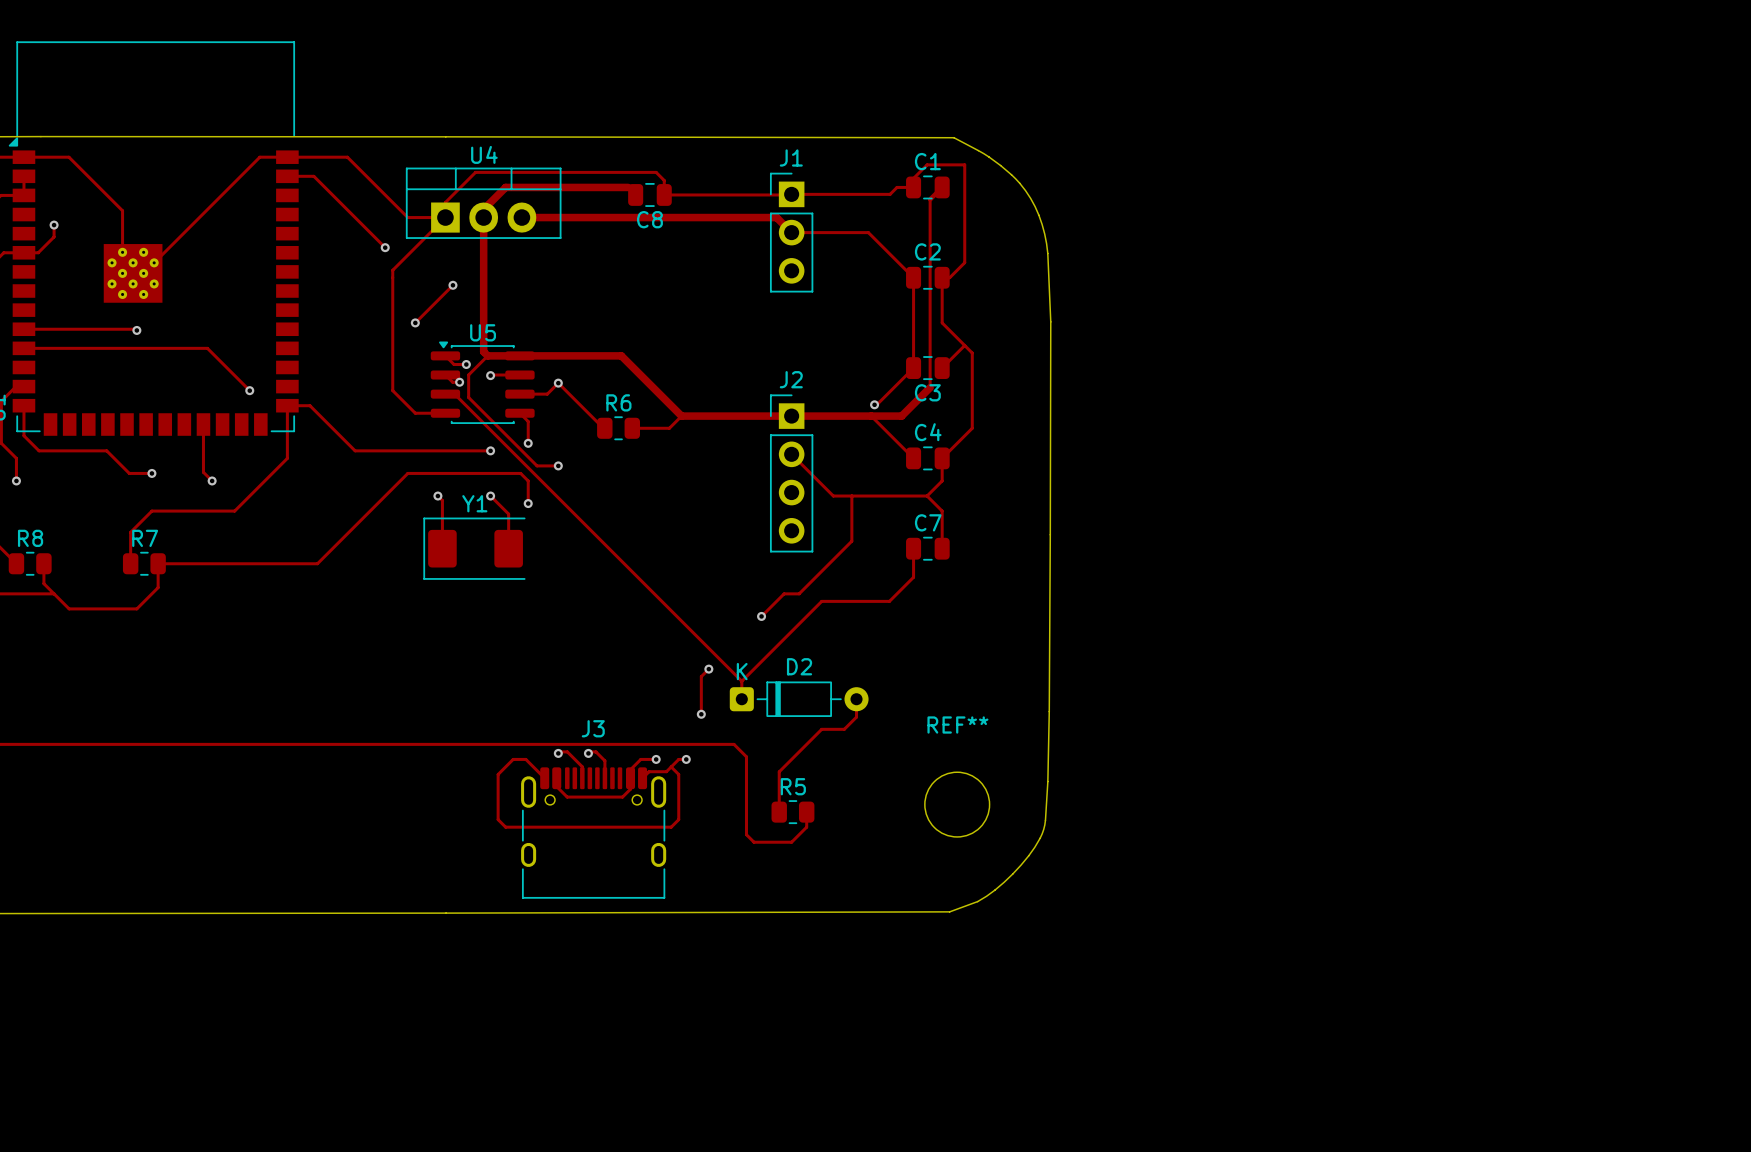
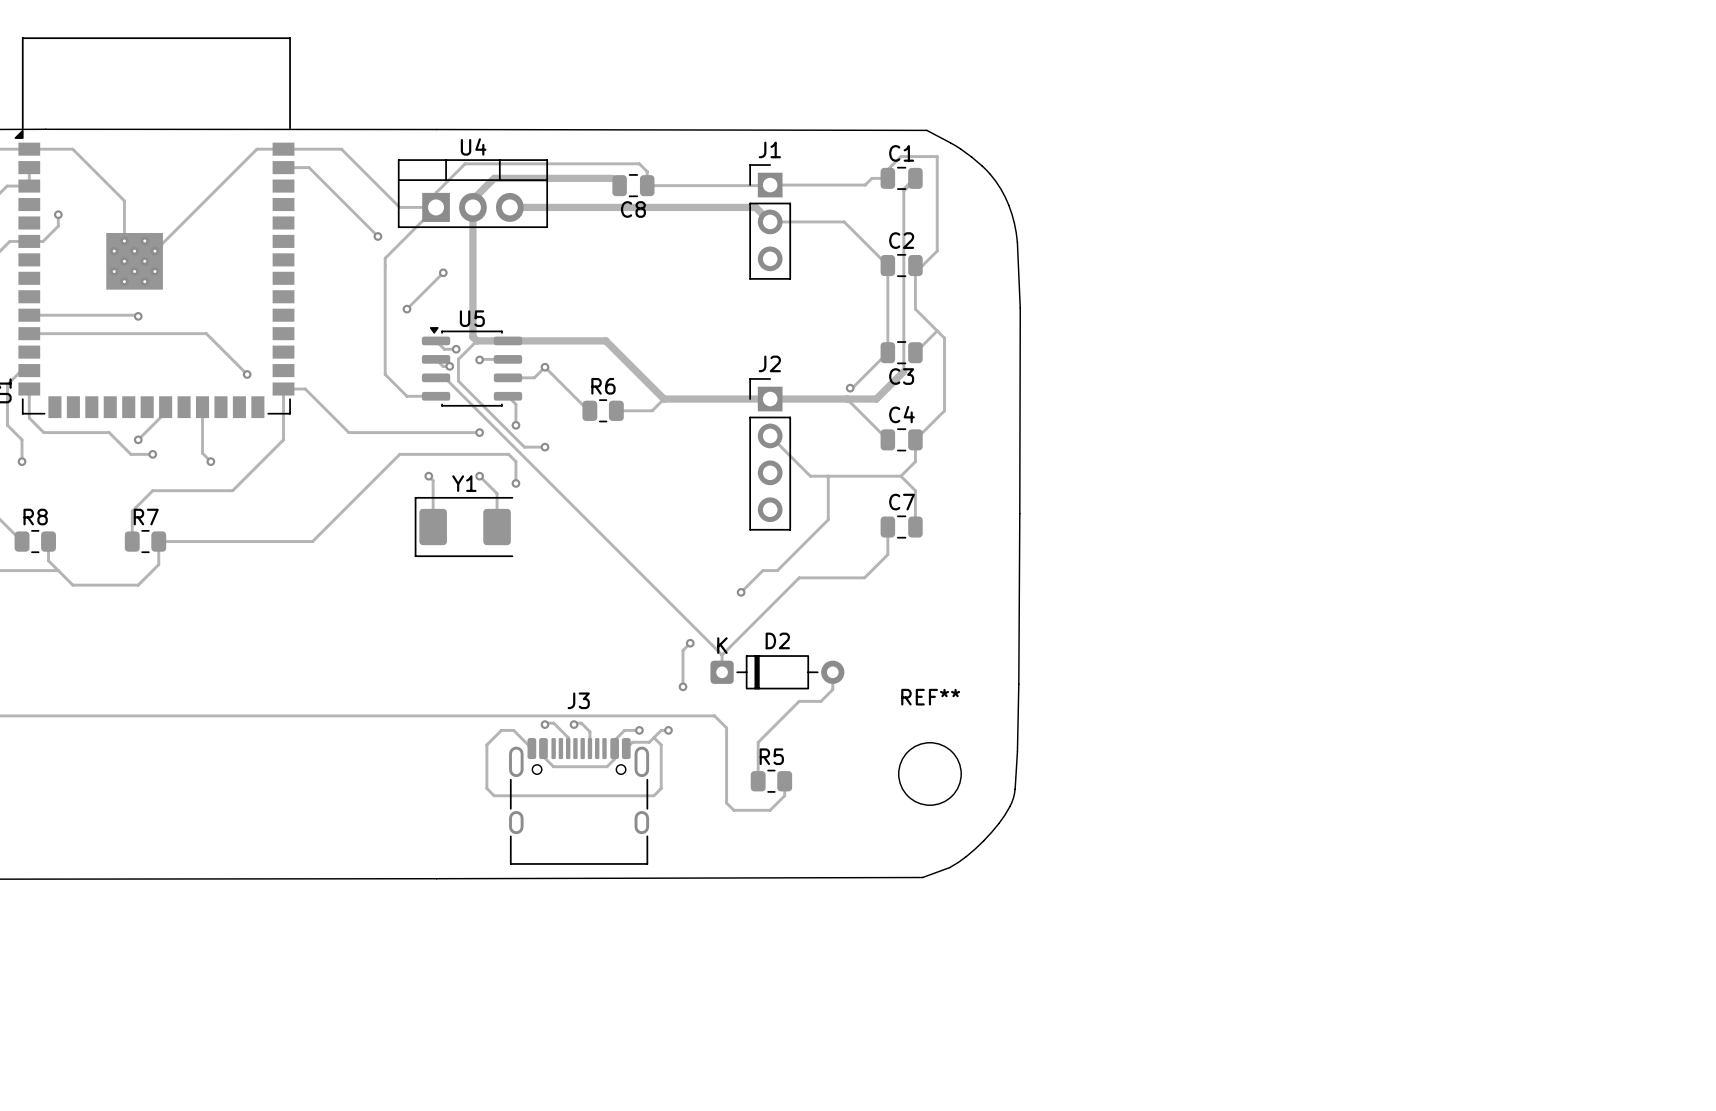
track: none -> (165, 412) (138, 439)
via: none -> (138, 439)

